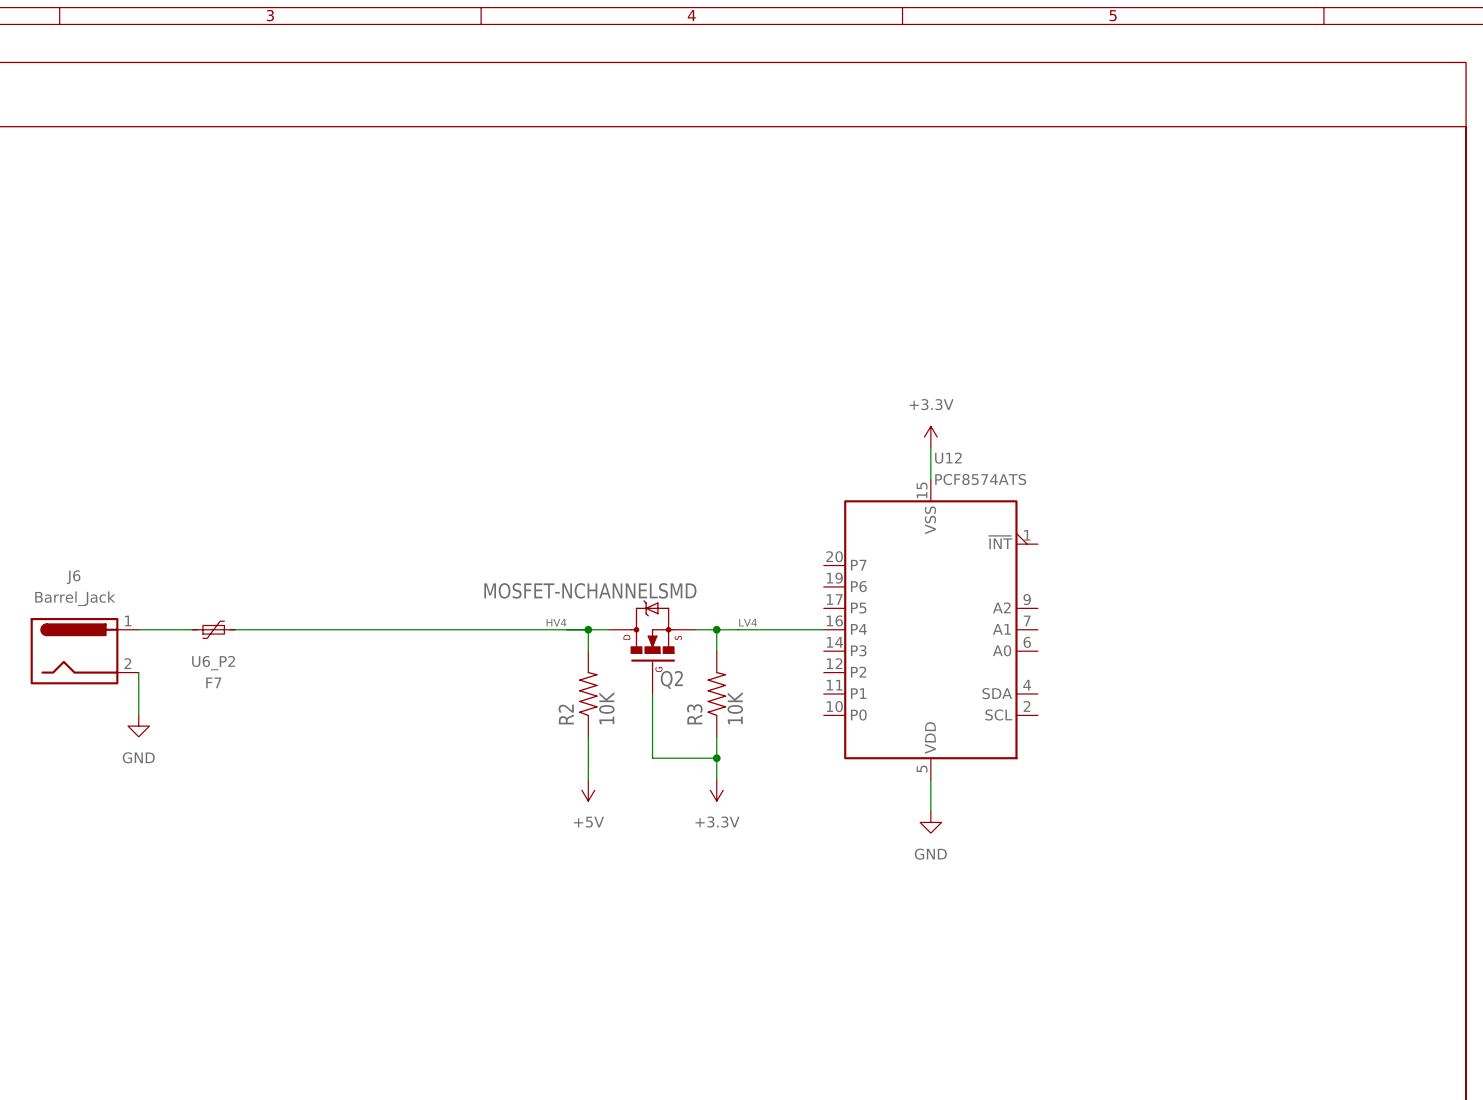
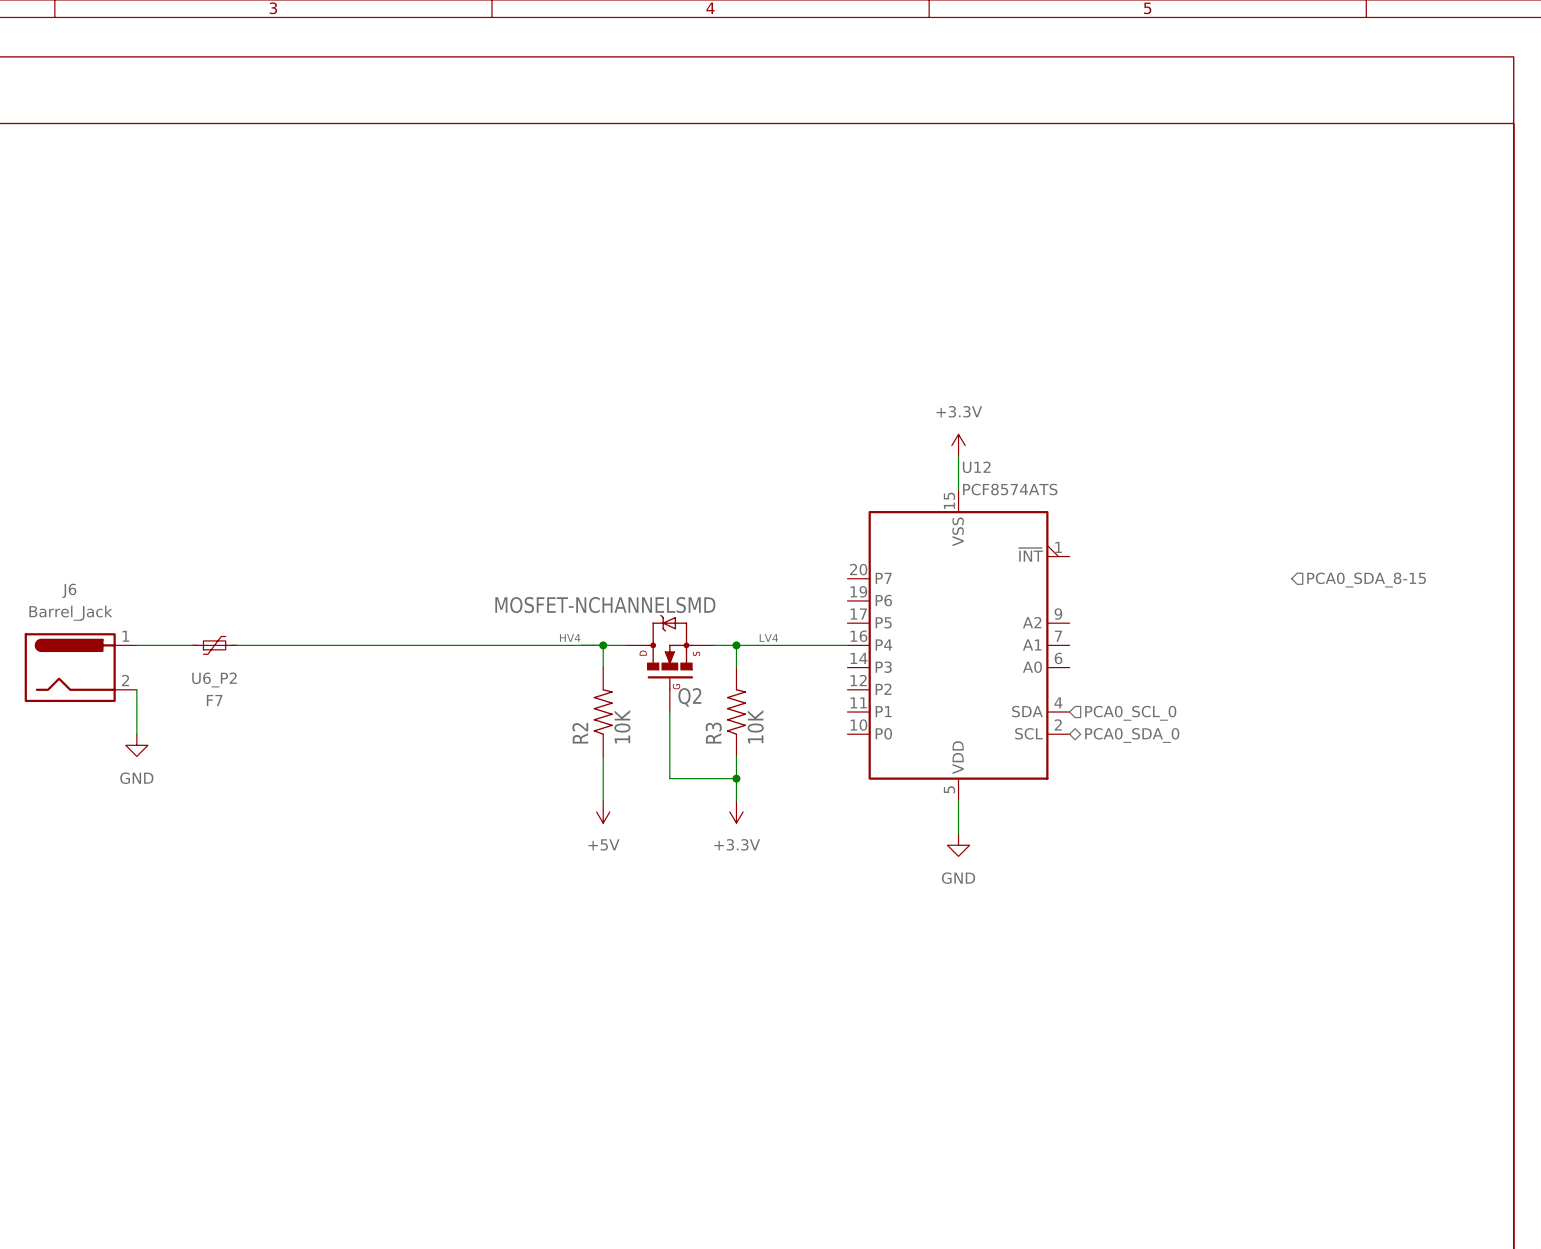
hierarchical label: none -> PCA0_SDA_8-15 (1366, 580)
hierarchical label: none -> PCA0_SCL_0 (1130, 713)
hierarchical label: none -> PCA0_SDA_0 (1132, 735)

